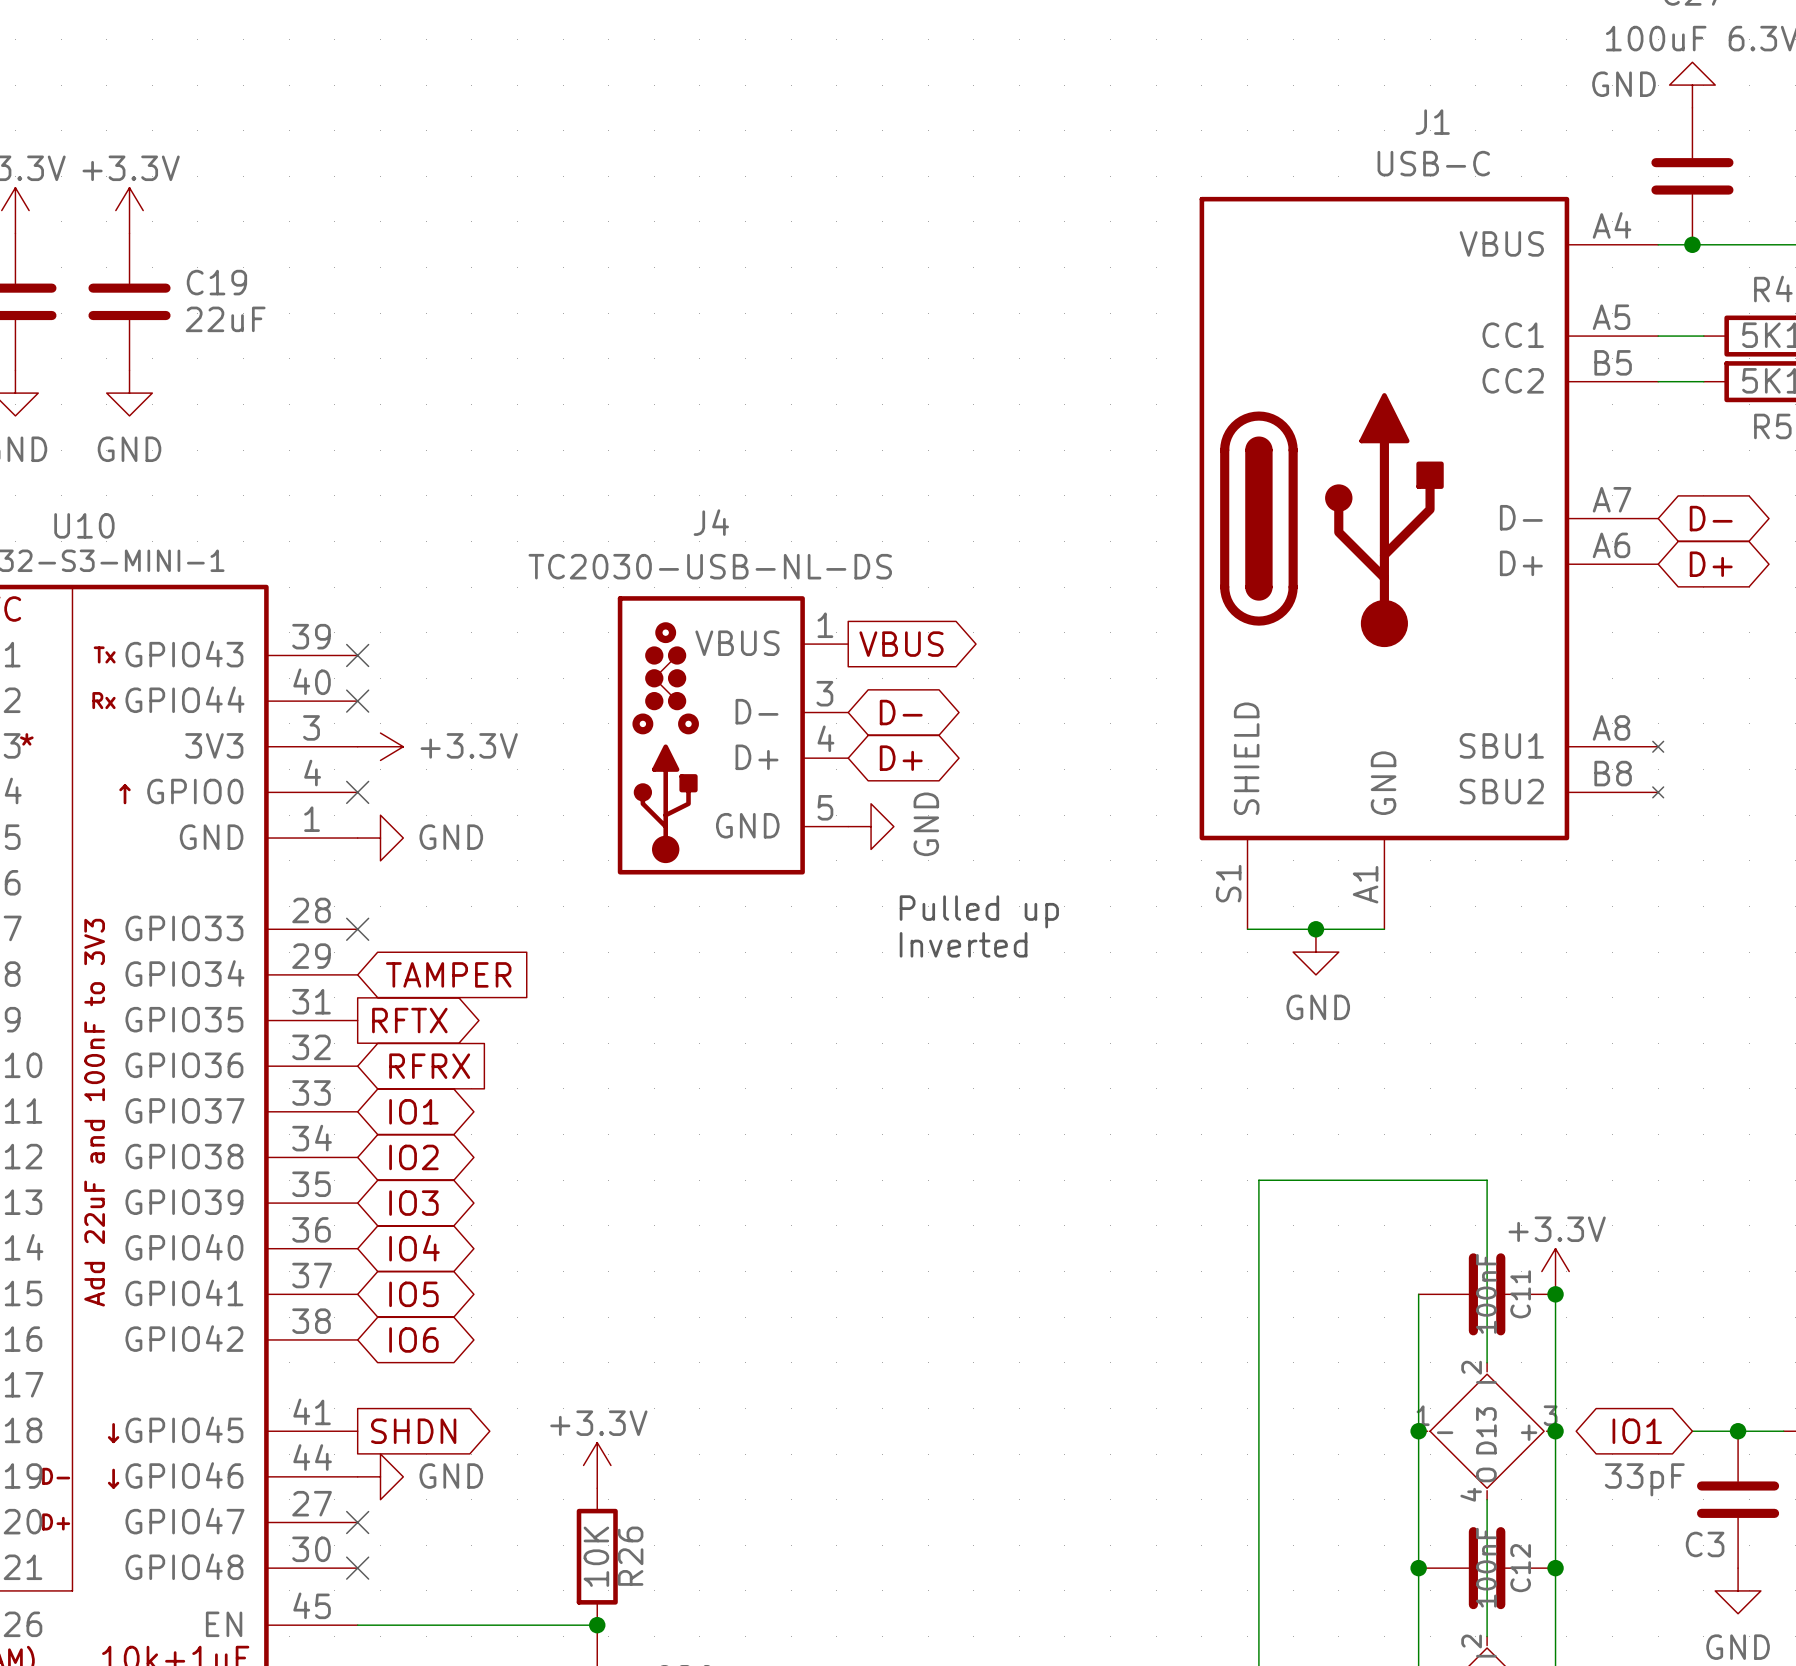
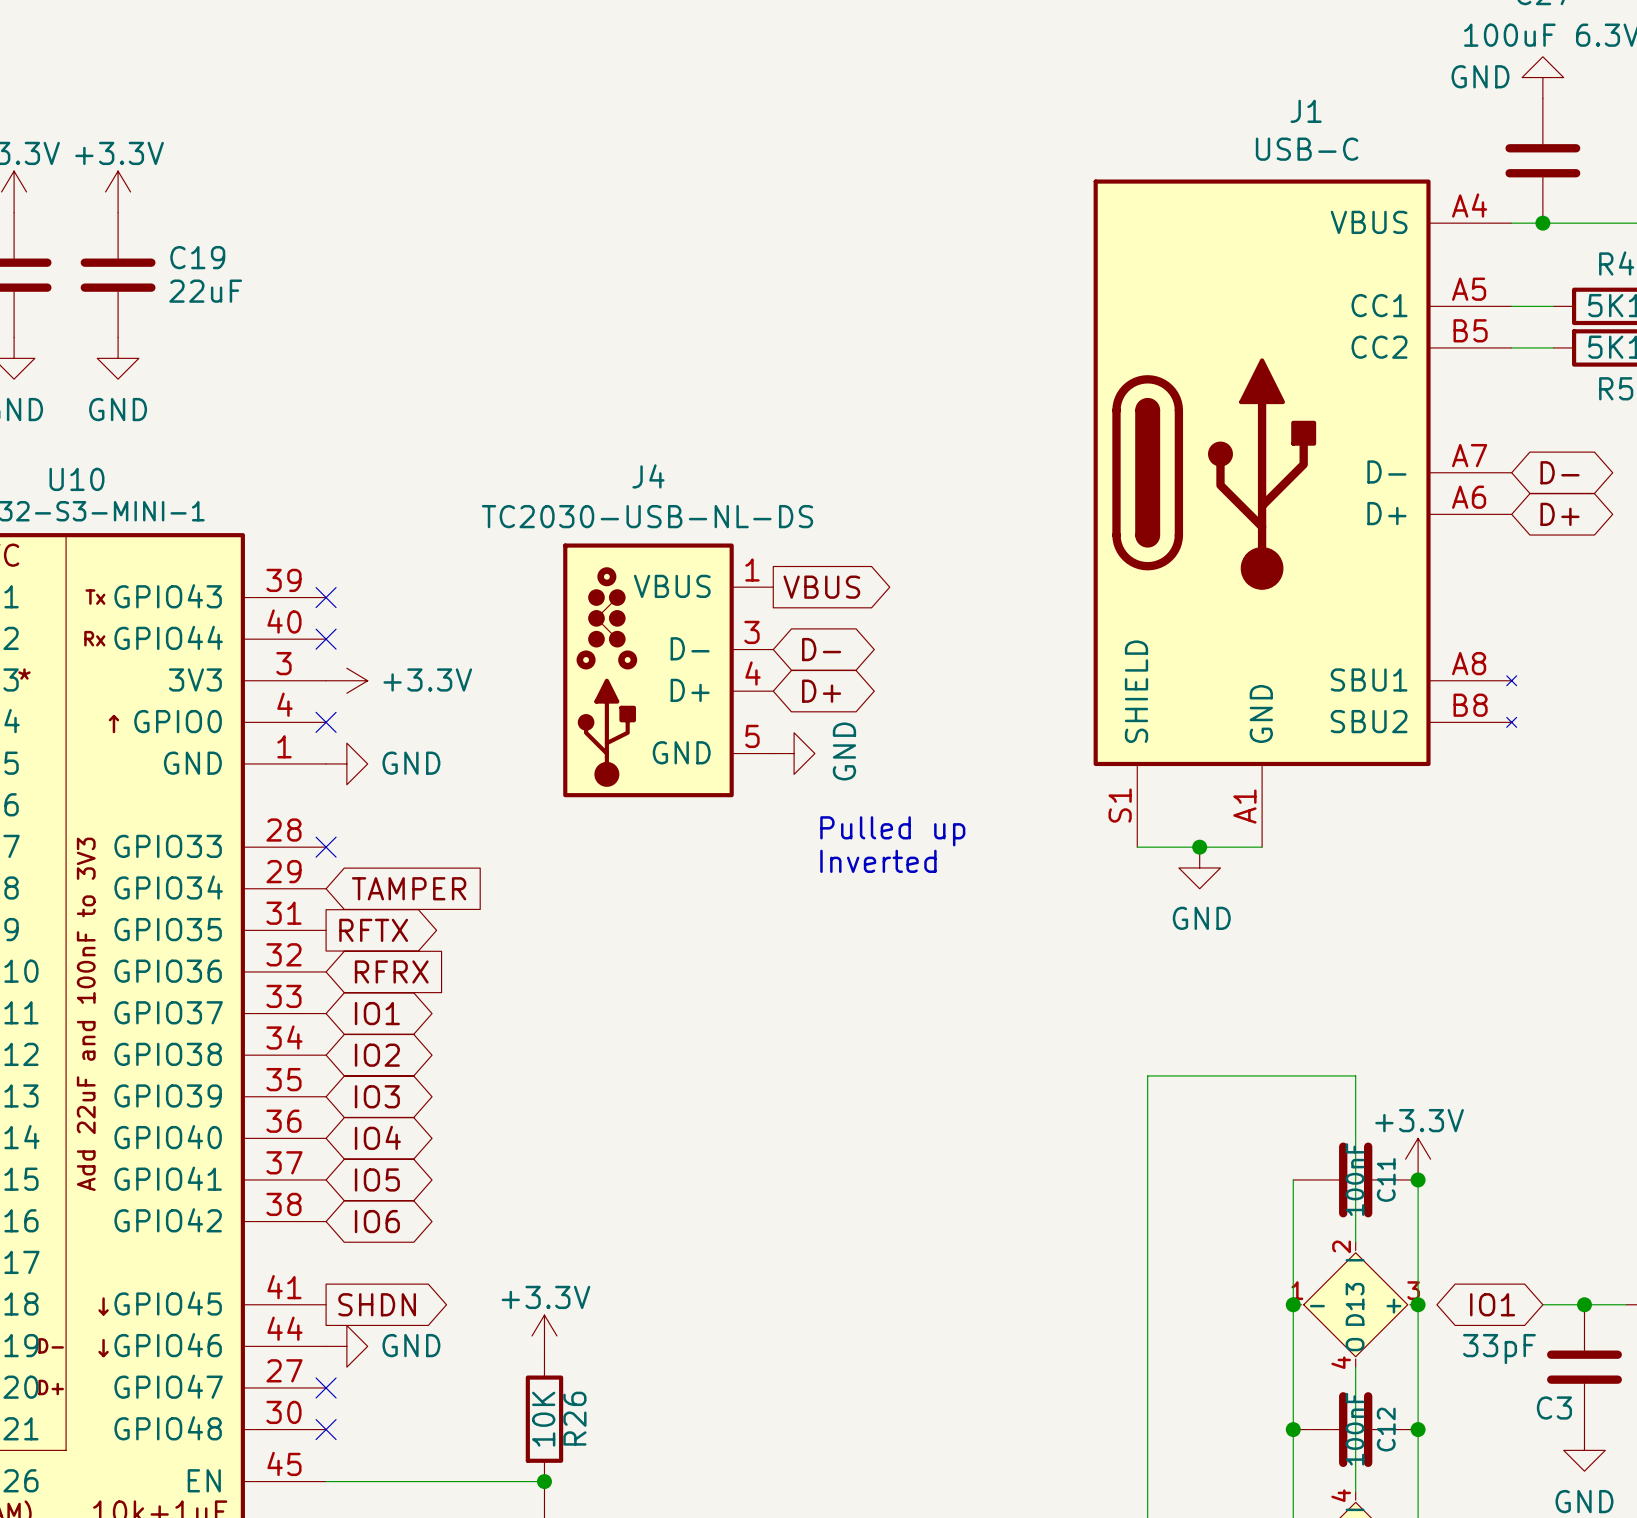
part pin number: 2 (1471, 1641) -> 4 (1341, 1495)

